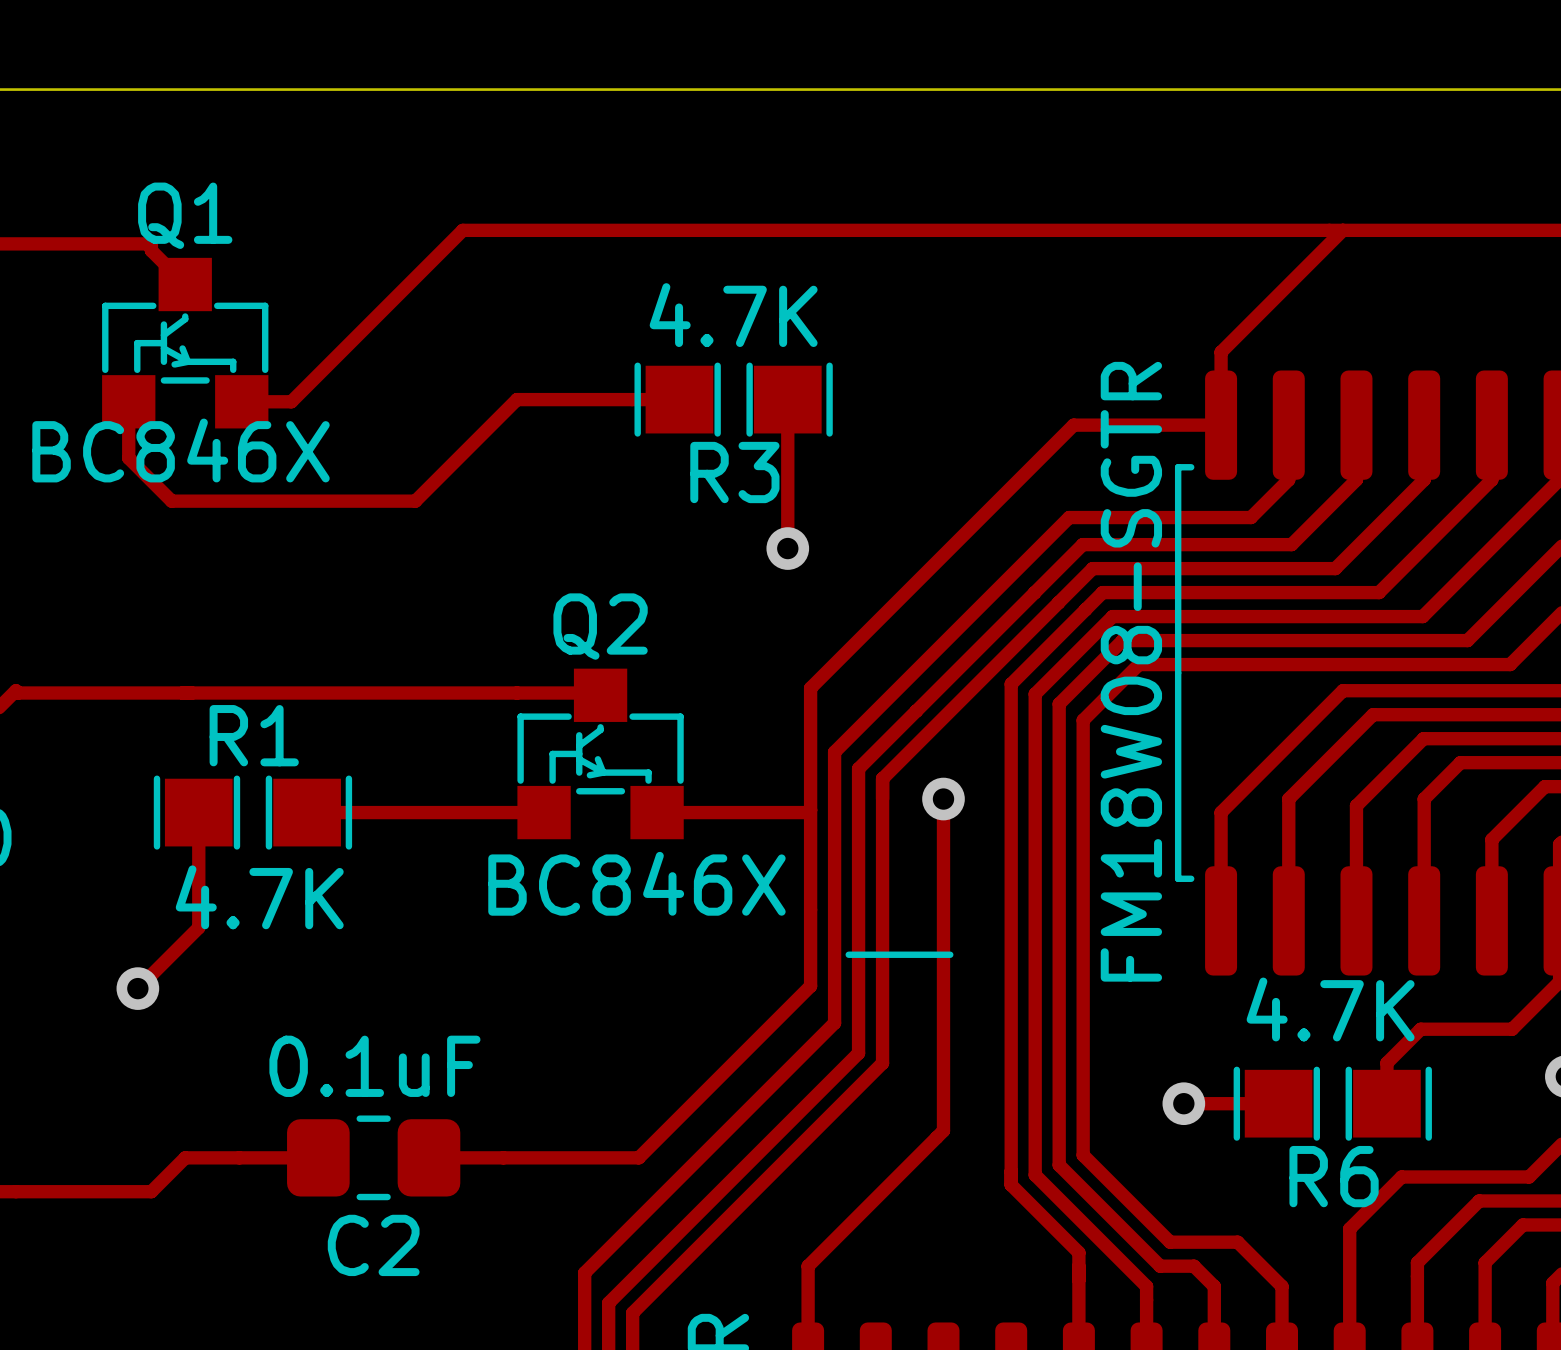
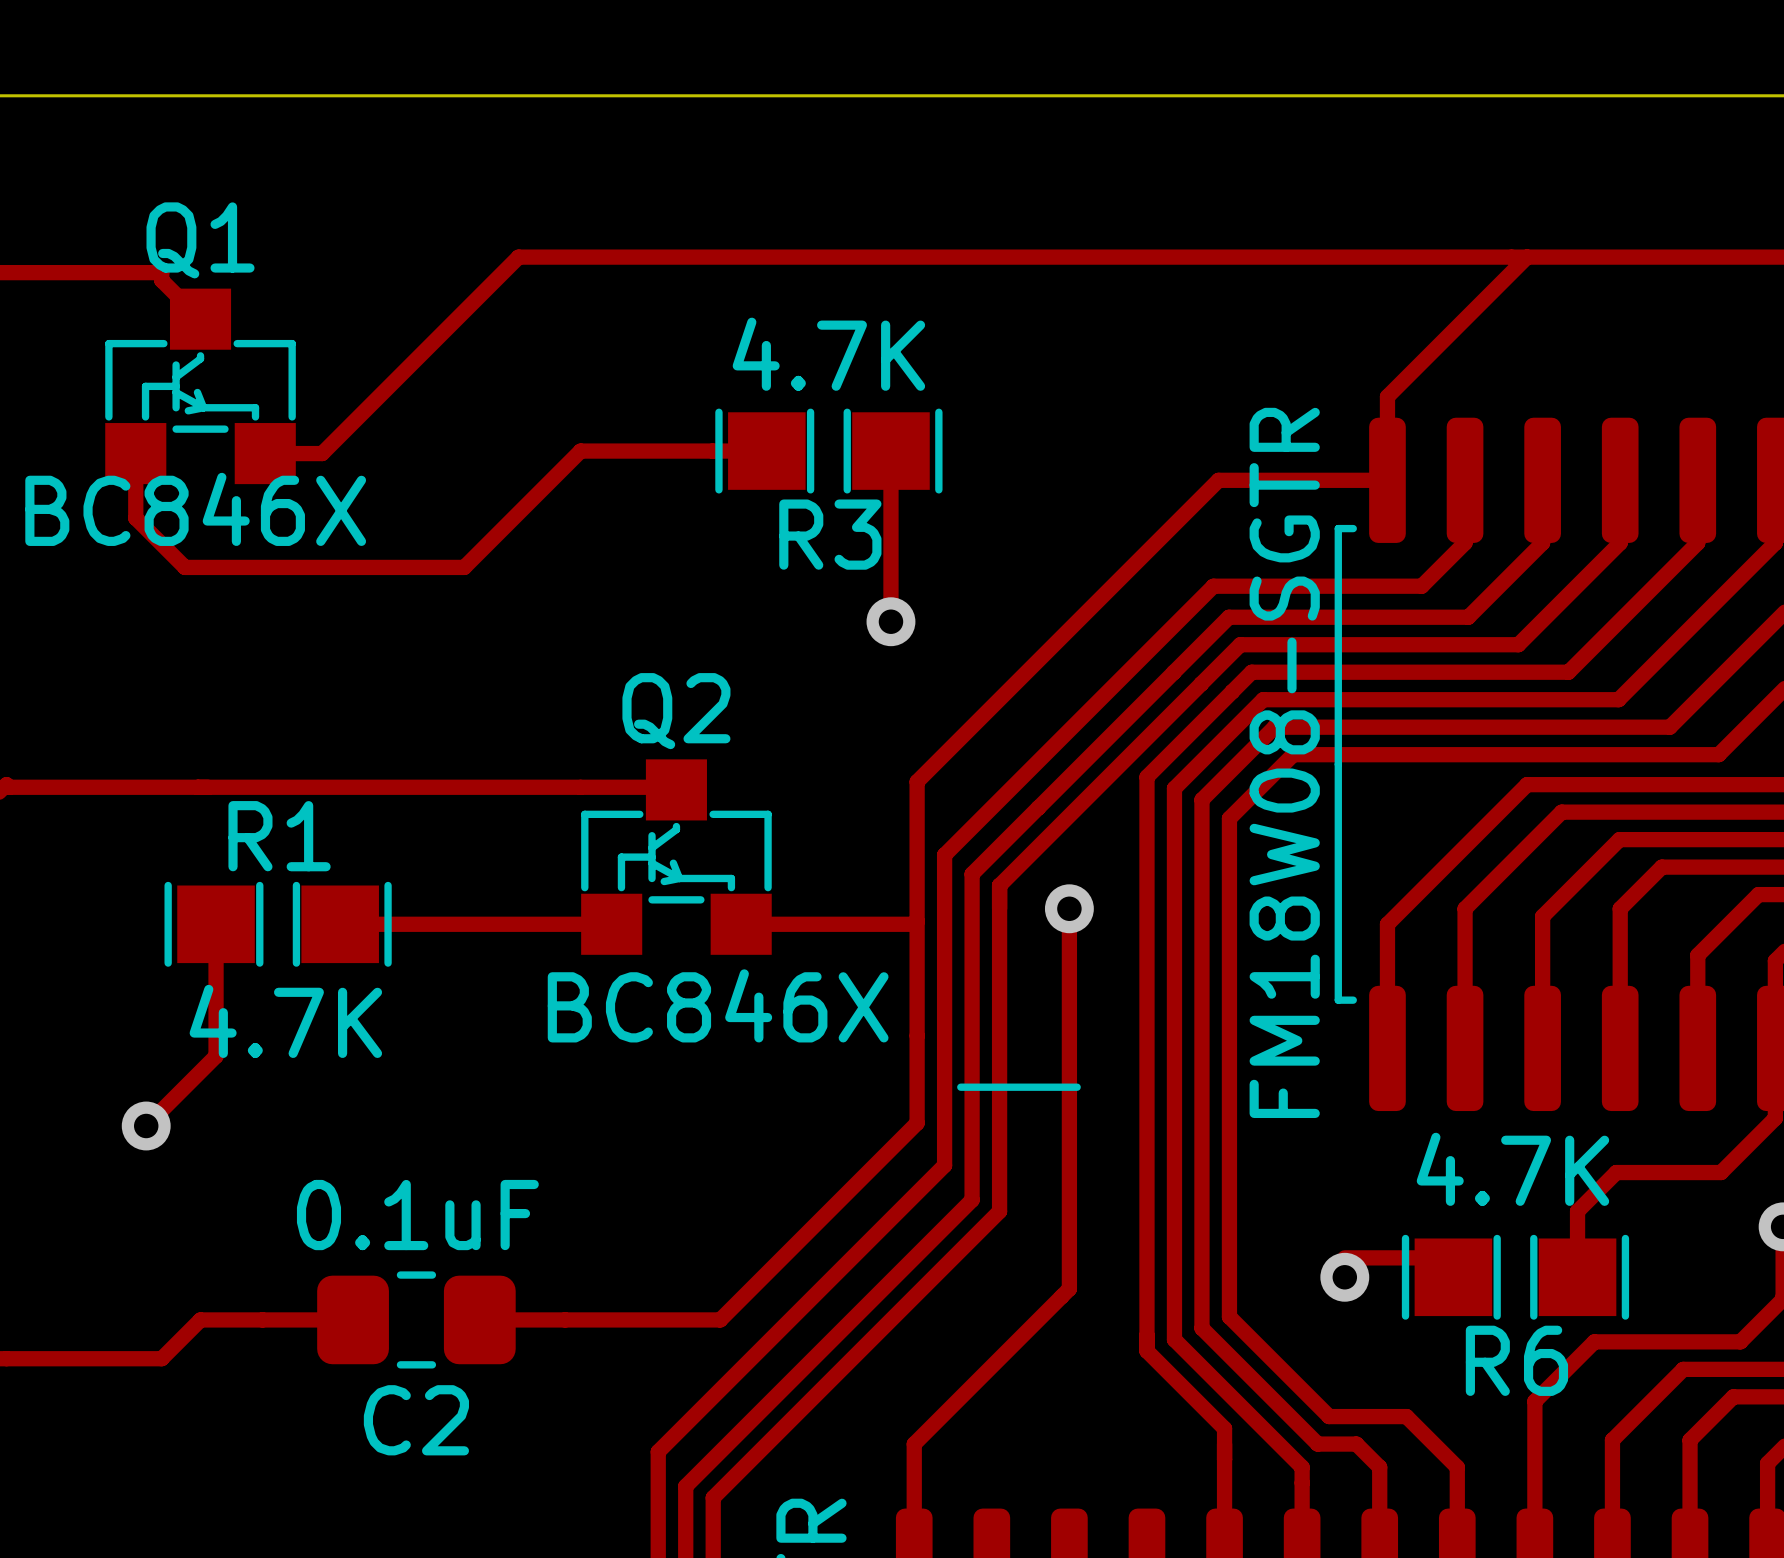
via position: (1183, 1103) -> (1344, 1277)
R6 position: (1332, 1103) -> (1515, 1277)

